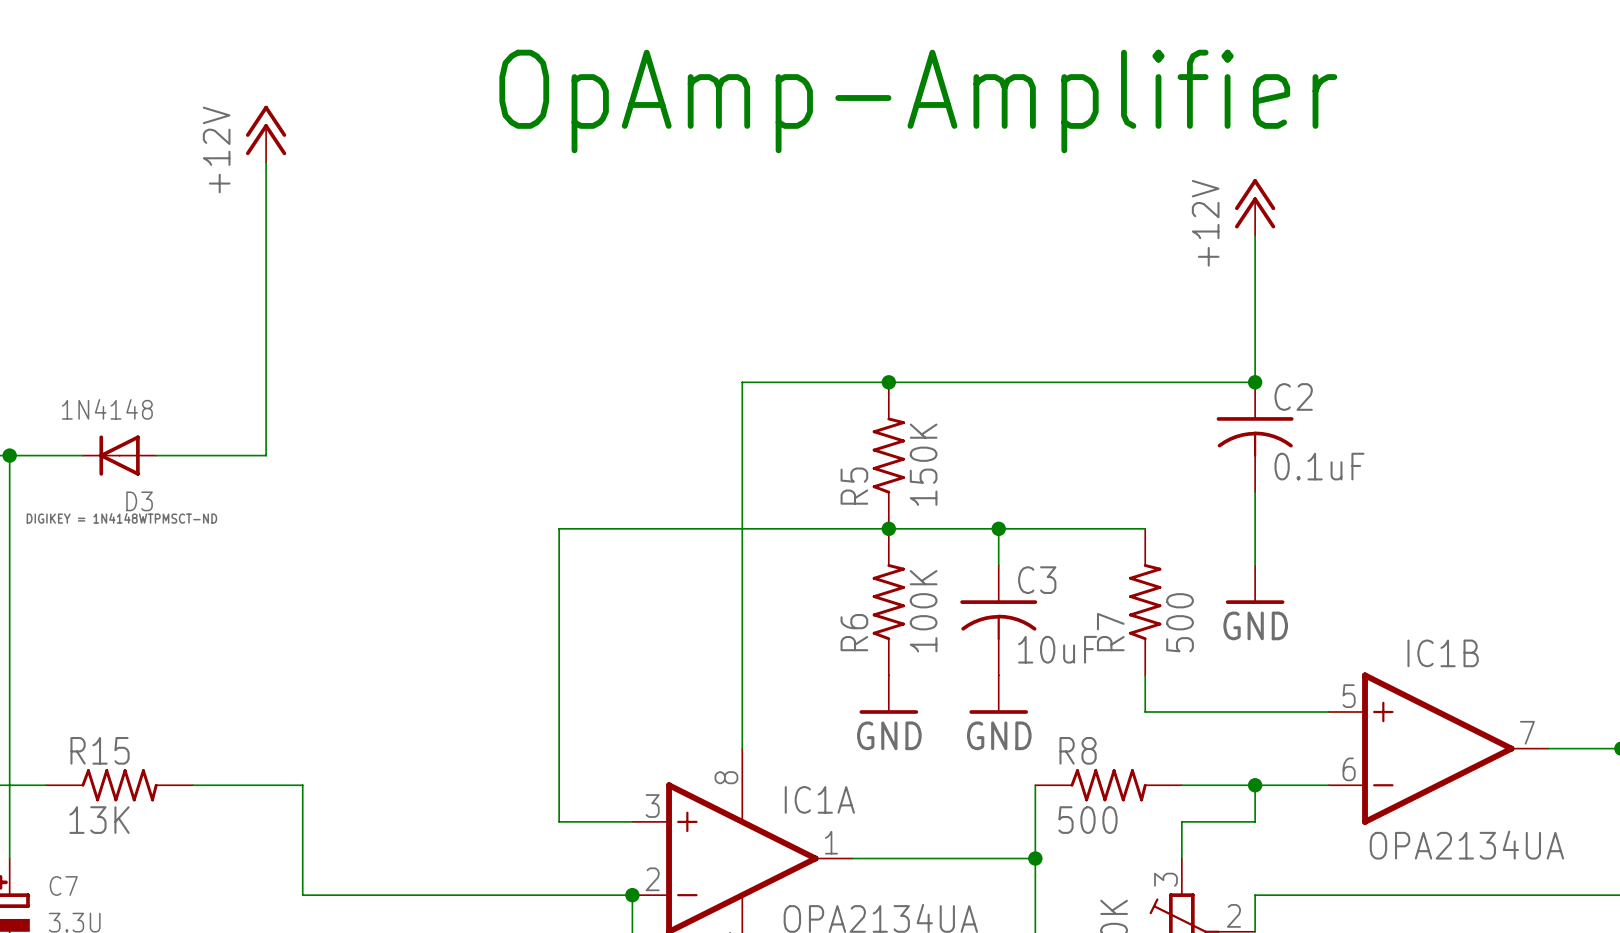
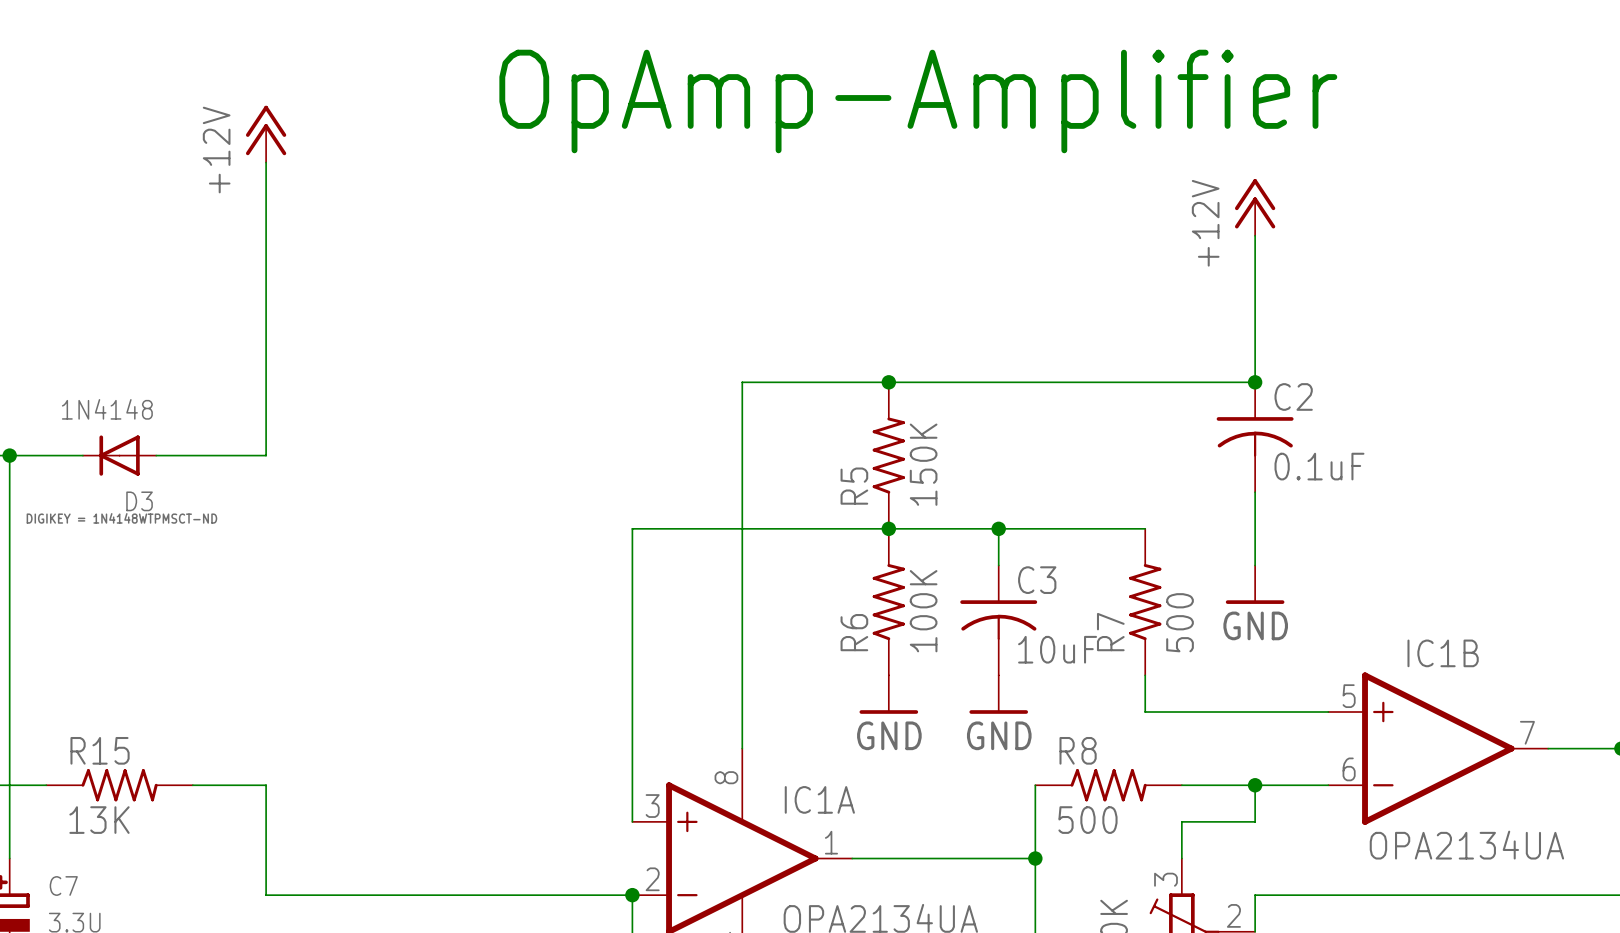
wire: (632, 528) (559, 528) (559, 821) (632, 821) -> (632, 528) (632, 821)
wire: (266, 785) (302, 785) (302, 895) -> (266, 785) (266, 895) (302, 895)

